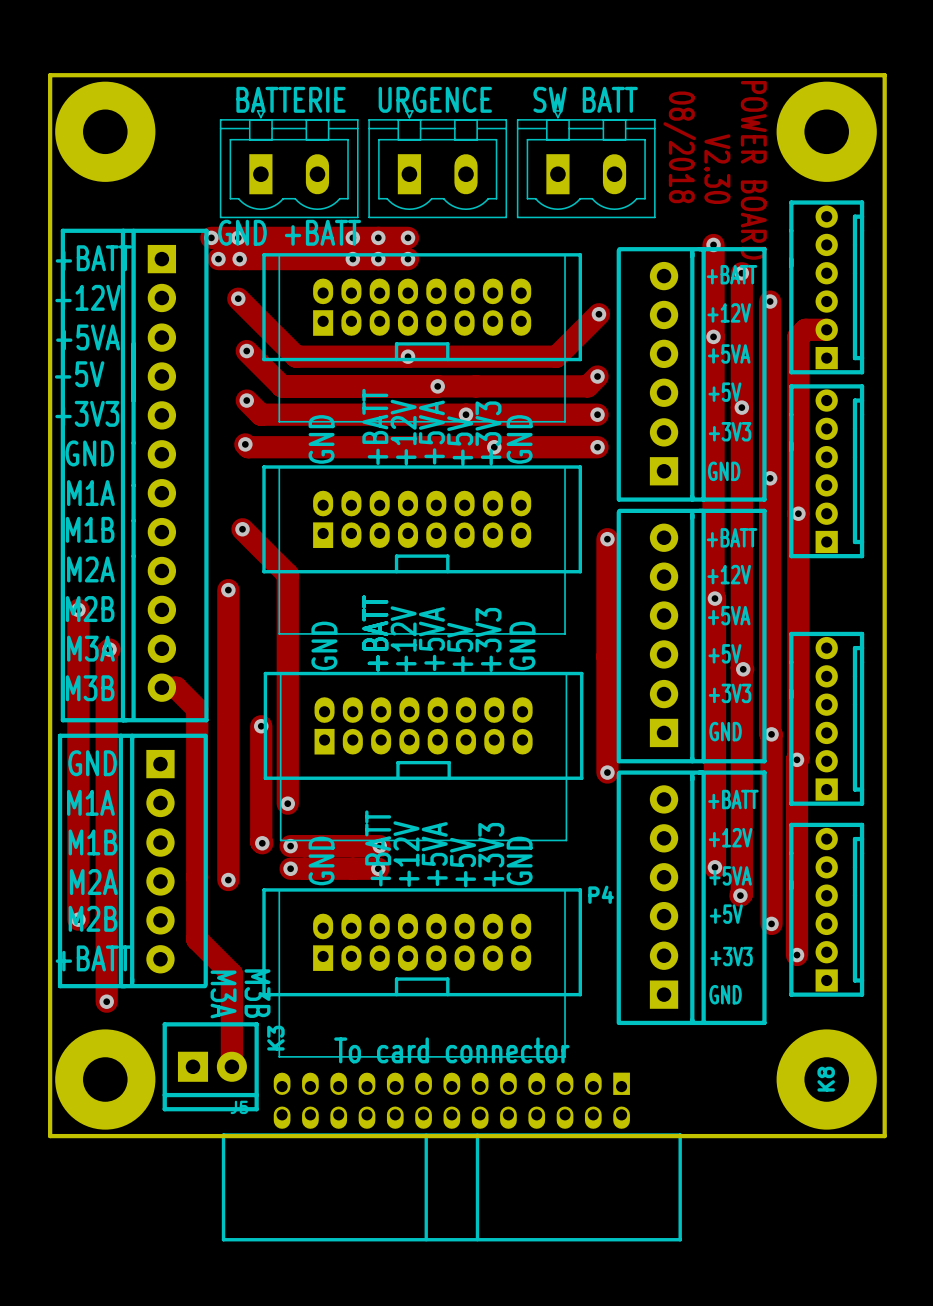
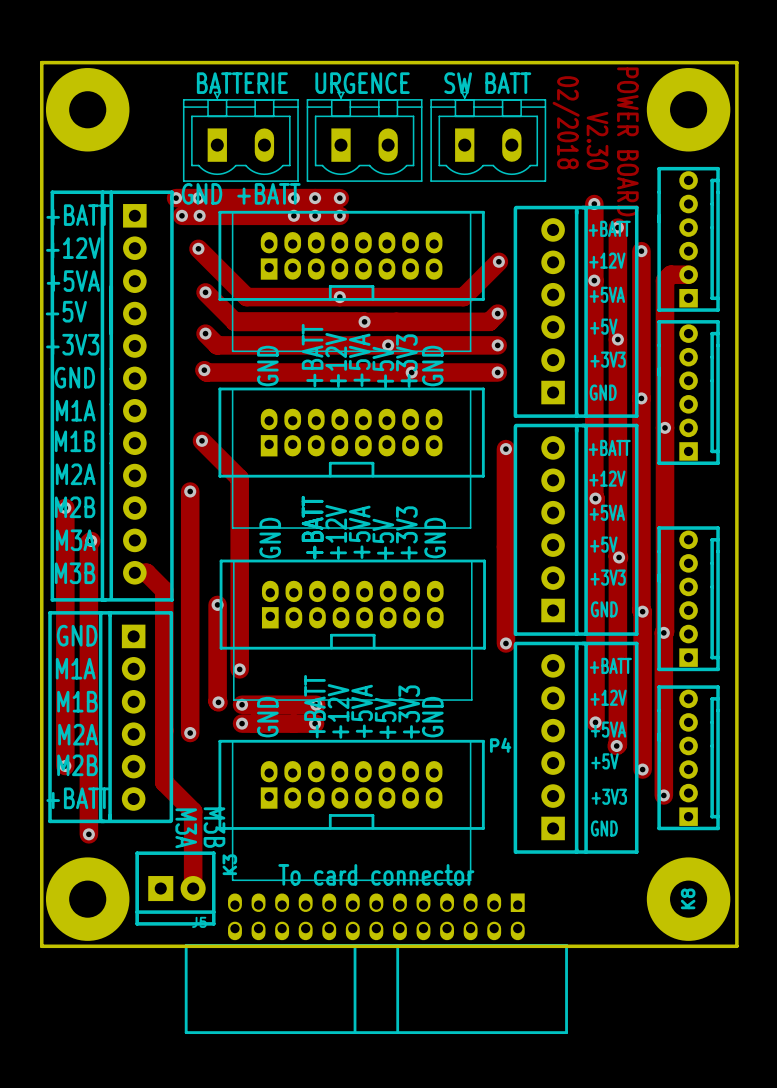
text: 08/2018 (679, 147) -> 02/2018 (566, 122)

